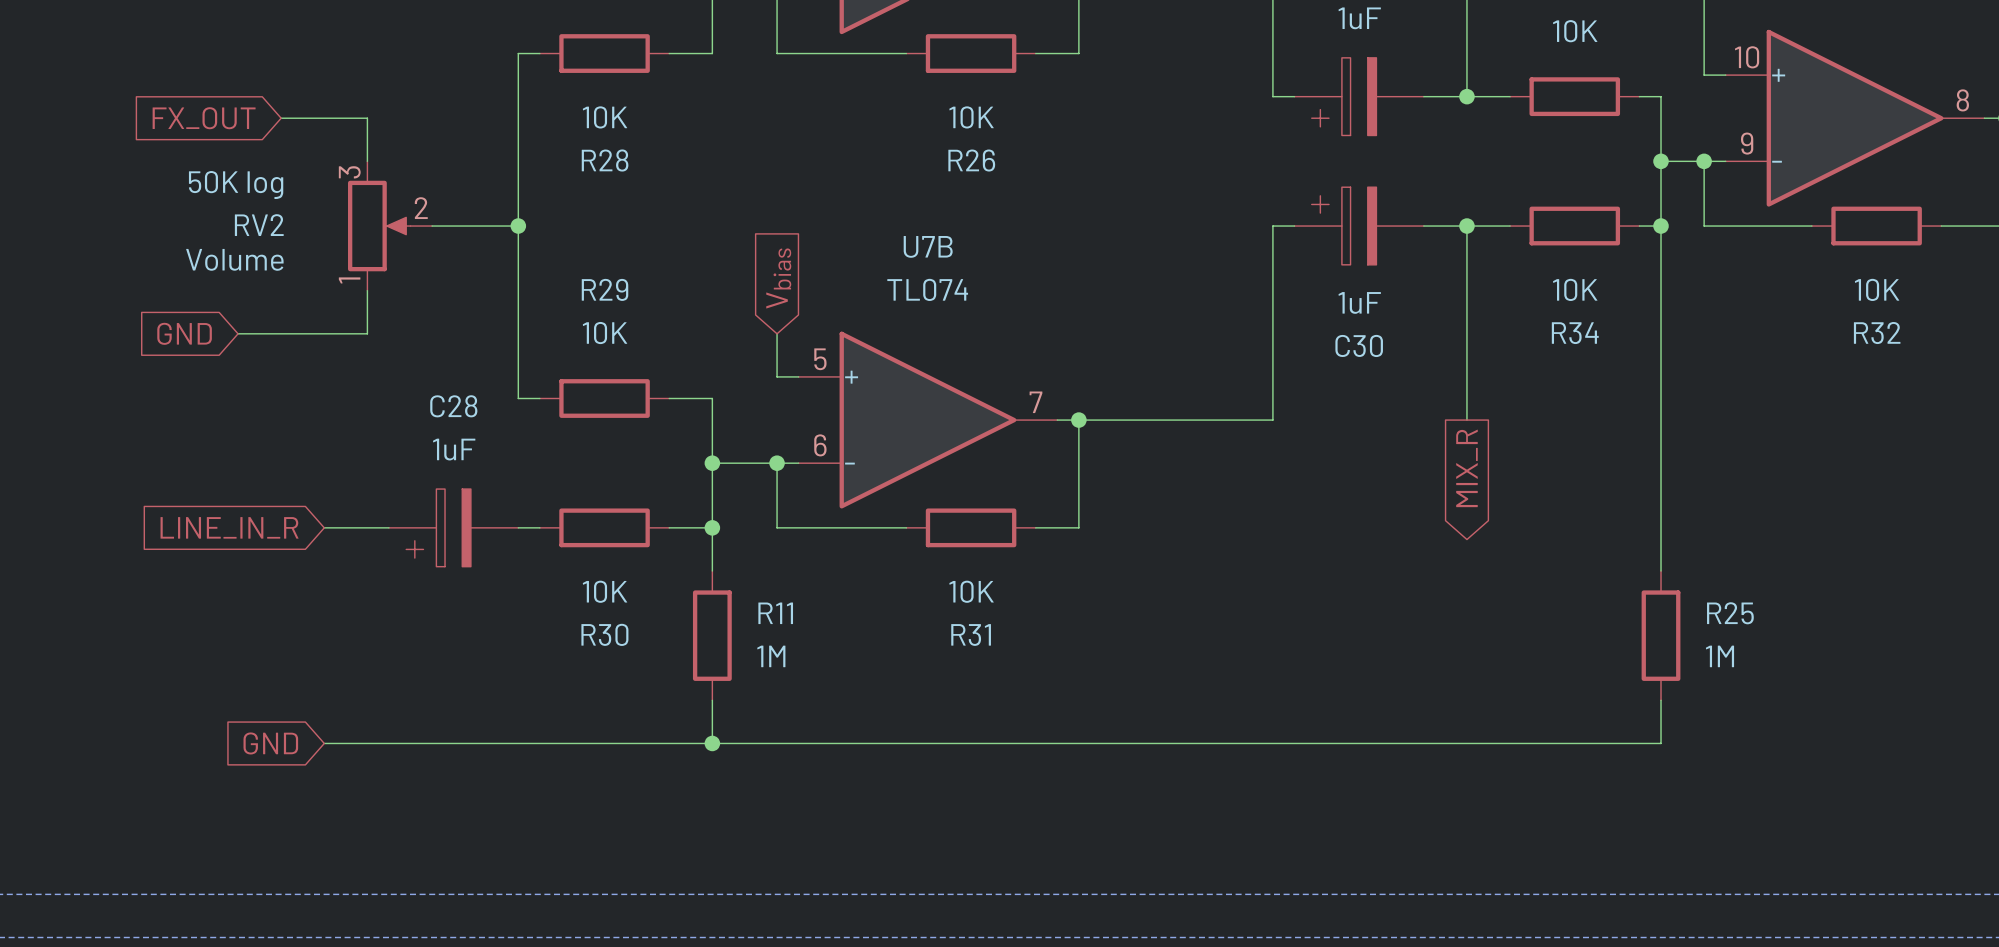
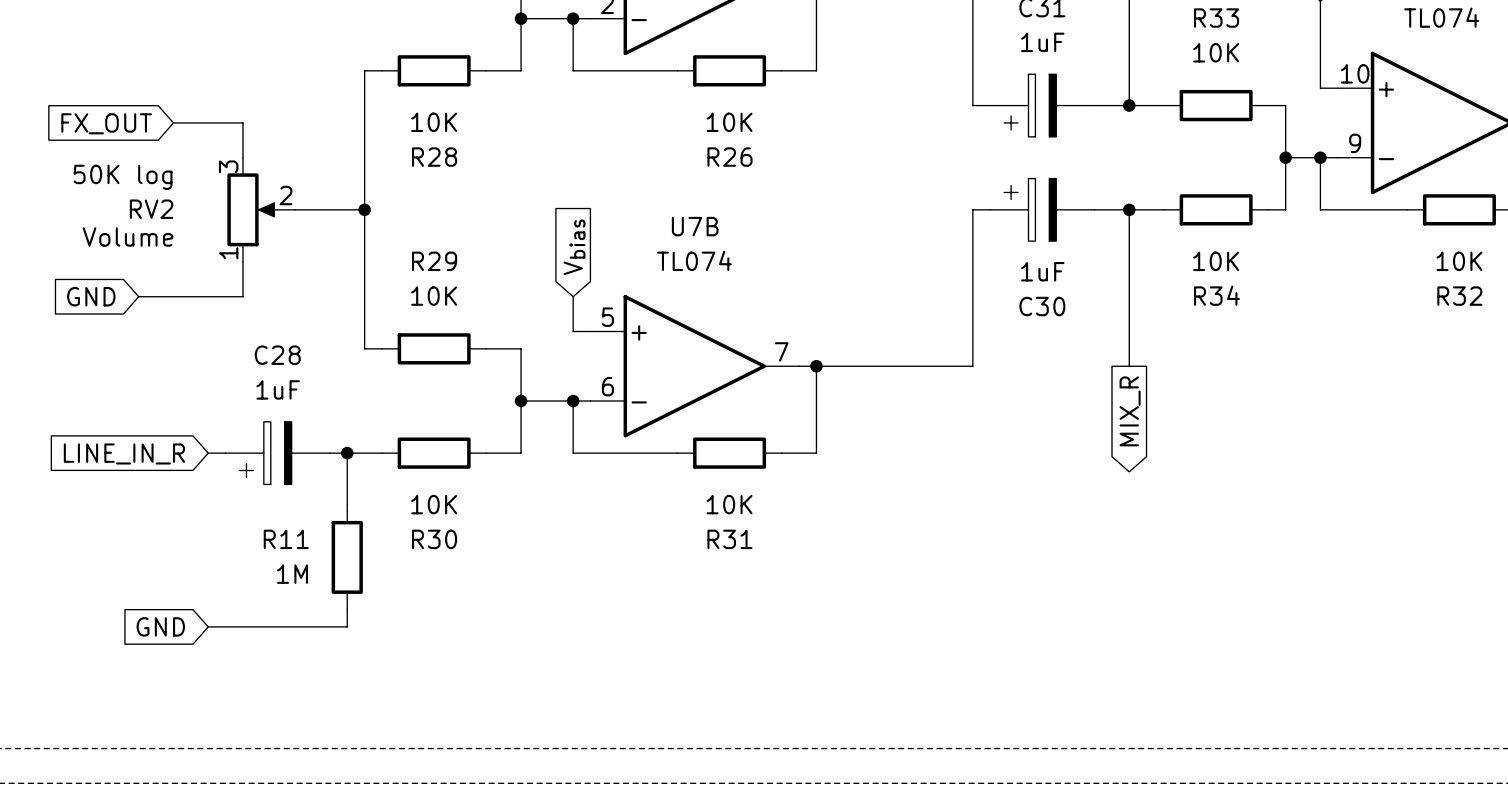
wire: (1661, 226) (1661, 570) -> none
junction: (1661, 226) -> none
C28 position: (453, 527) -> (277, 453)
wire: none -> (347, 453) (347, 505)
junction: none -> (347, 453)
wire: (712, 527) (712, 570) -> none
junction: (712, 527) -> none
R11 name position: R11 (775, 613) -> R11 (286, 539)
R11 position: (712, 635) -> (347, 557)
R25: 1M (1661, 635) -> none
R11 value position: 1M (771, 656) -> 1M (292, 574)
wire: (712, 700) (712, 743) -> none
wire: (1661, 700) (1661, 743) (496, 743) -> (347, 609) (347, 626)
junction: (712, 743) -> none

